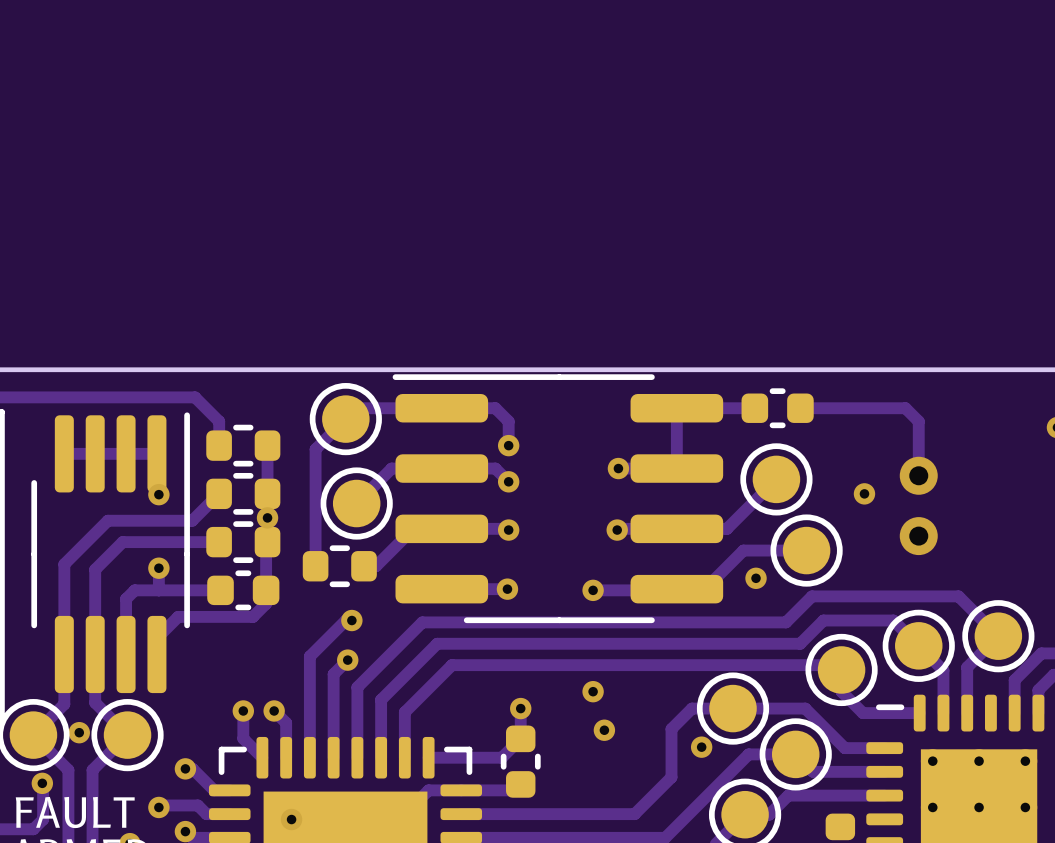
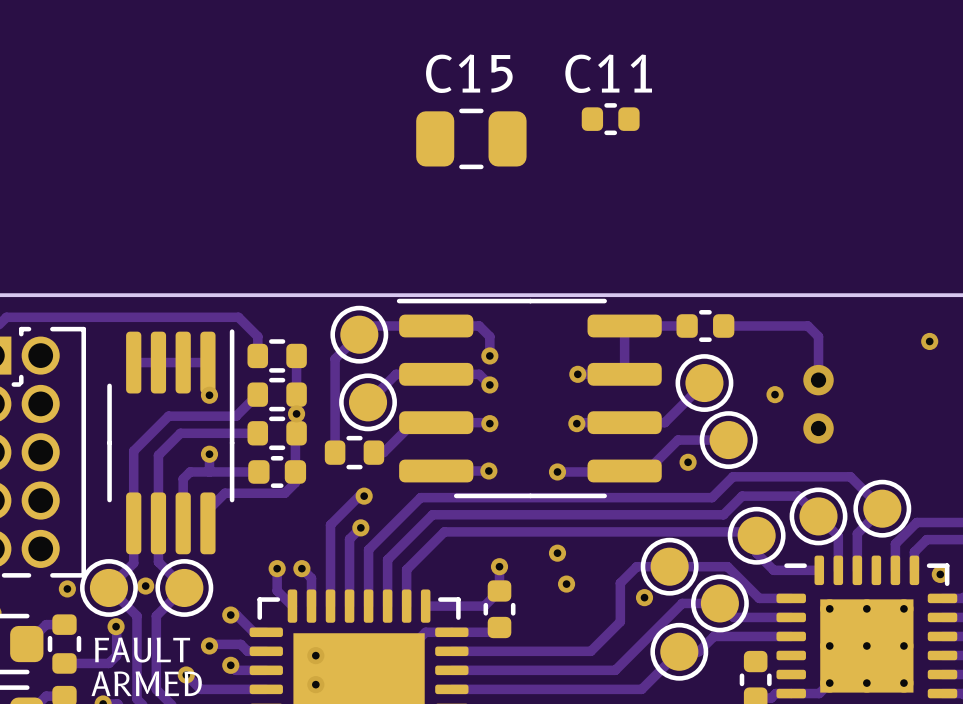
C11: none -> (610, 119)
C15: none -> (471, 138)

